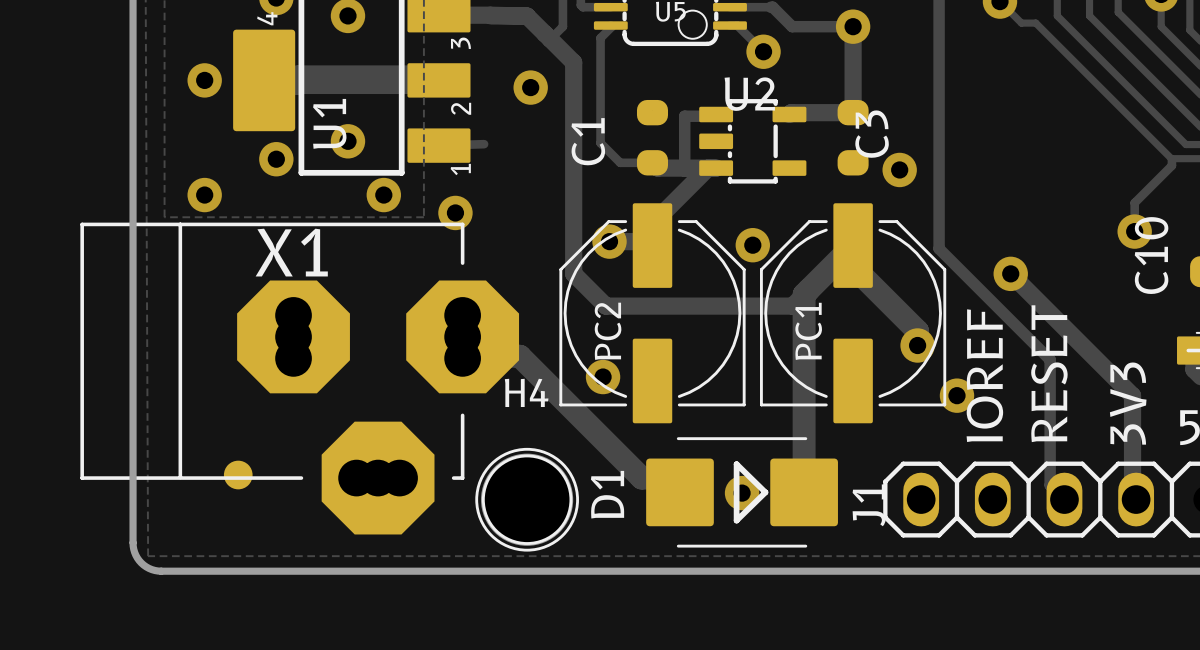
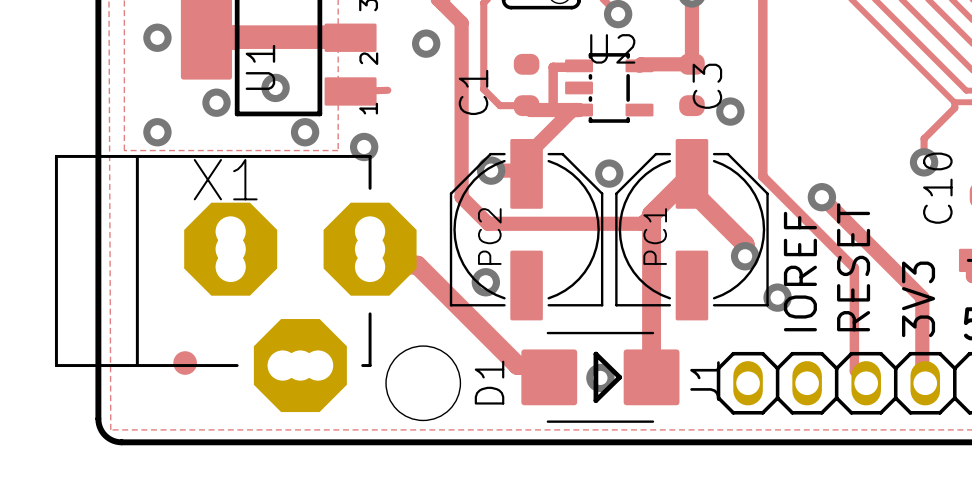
H4 name: H4 (526, 392) -> none
drawing: [475, 447, 579, 552] -> none

